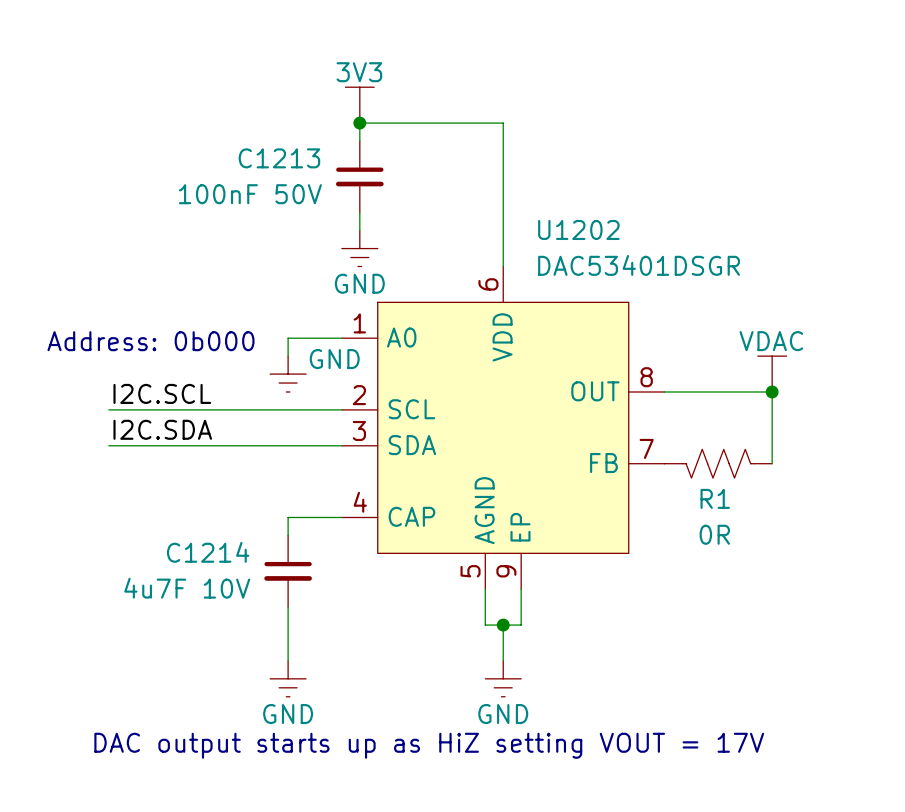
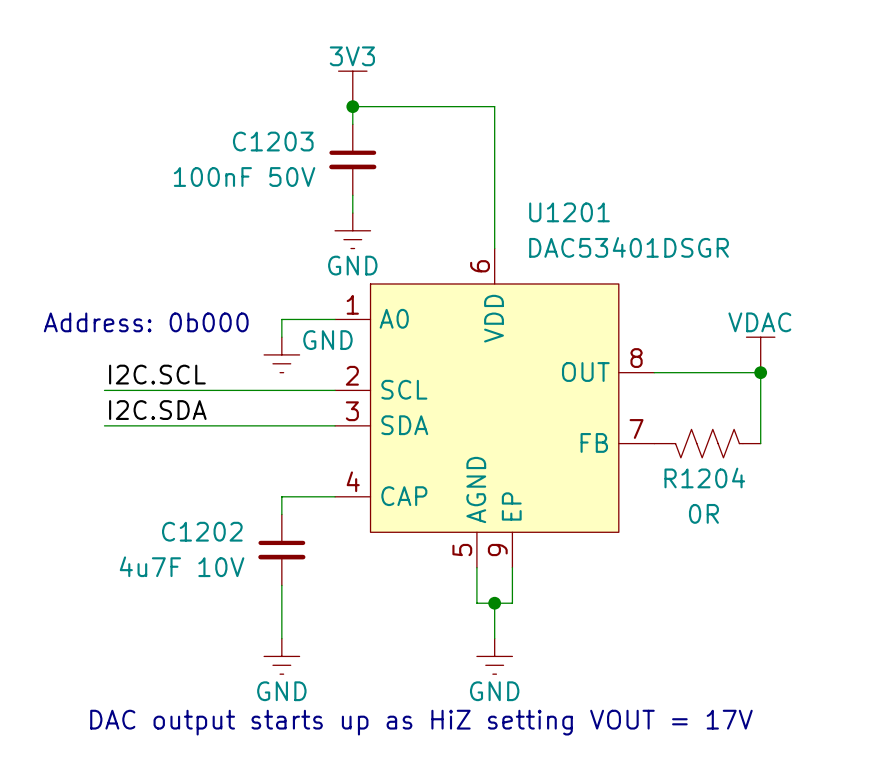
C1213 name: C1213 (279, 158) -> C1203 (273, 141)
U1202 name: U1202 (578, 229) -> U1201 (569, 212)
R1 name: R1 (715, 498) -> R1204 (704, 477)
C1214 name: C1214 (208, 552) -> C1202 (202, 531)

